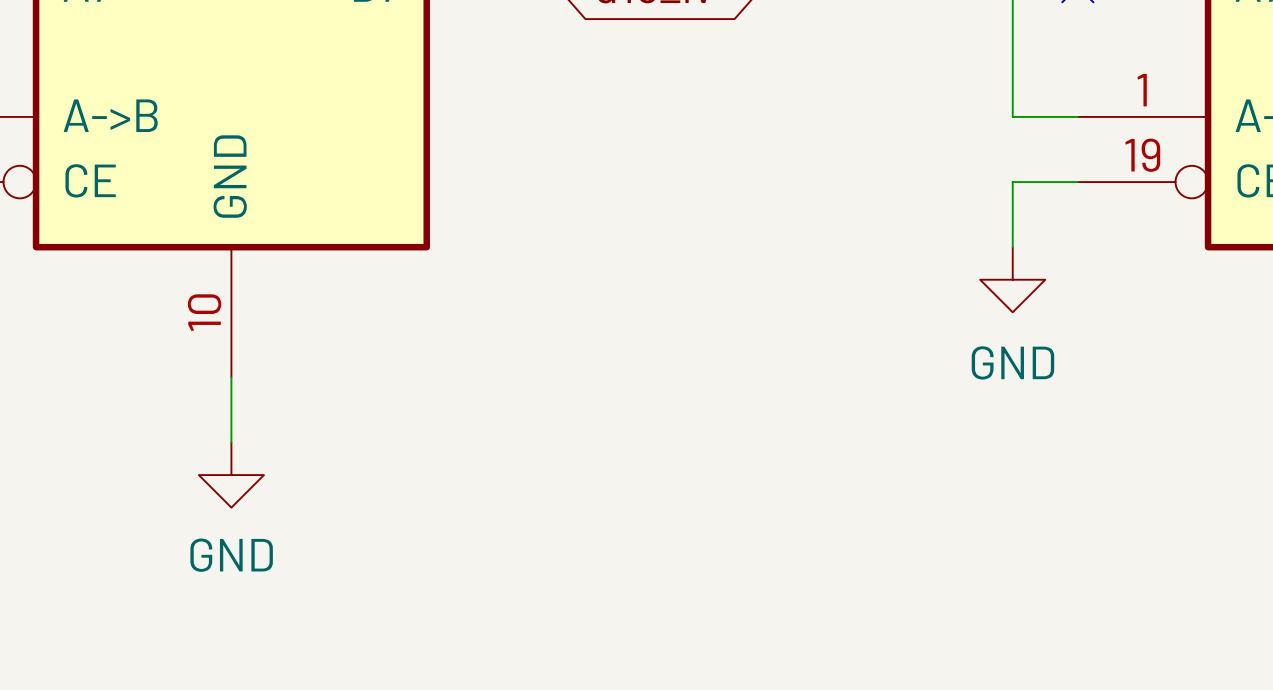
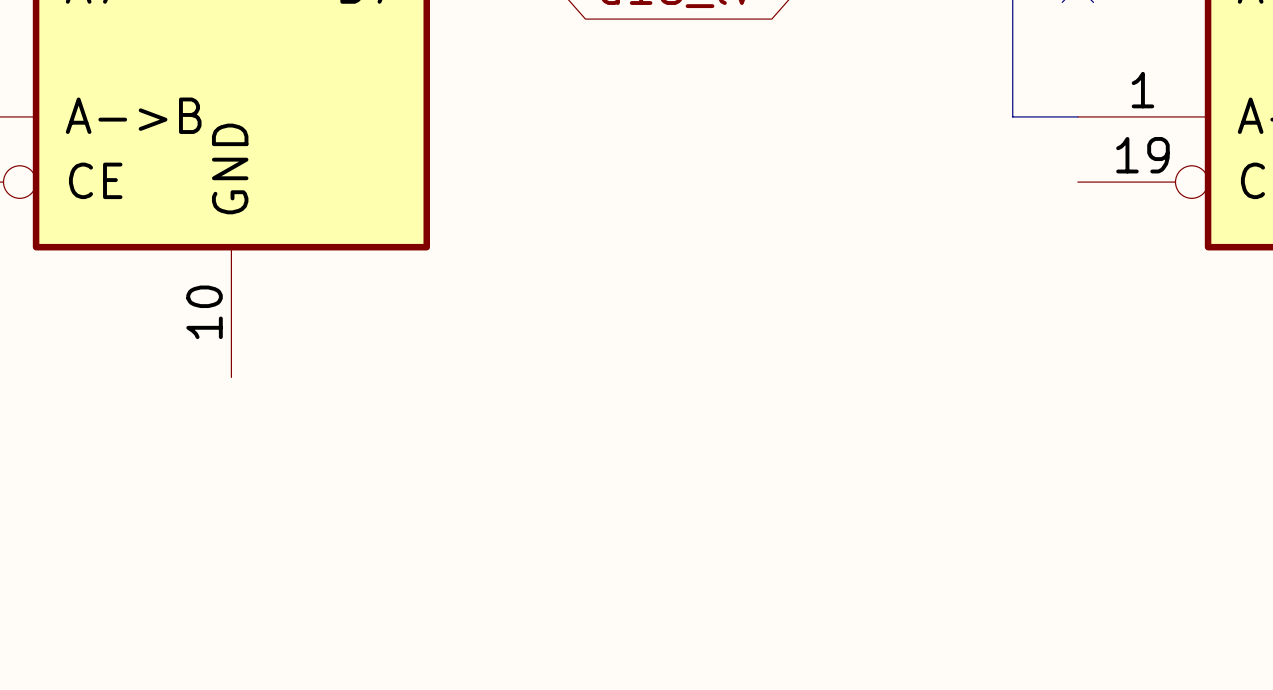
wire: (1077, 182) (1012, 182) (1012, 247) -> none
power symbol: GND (1012, 279) -> none
wire: (231, 377) (231, 442) -> none
power symbol: GND (231, 475) -> none

